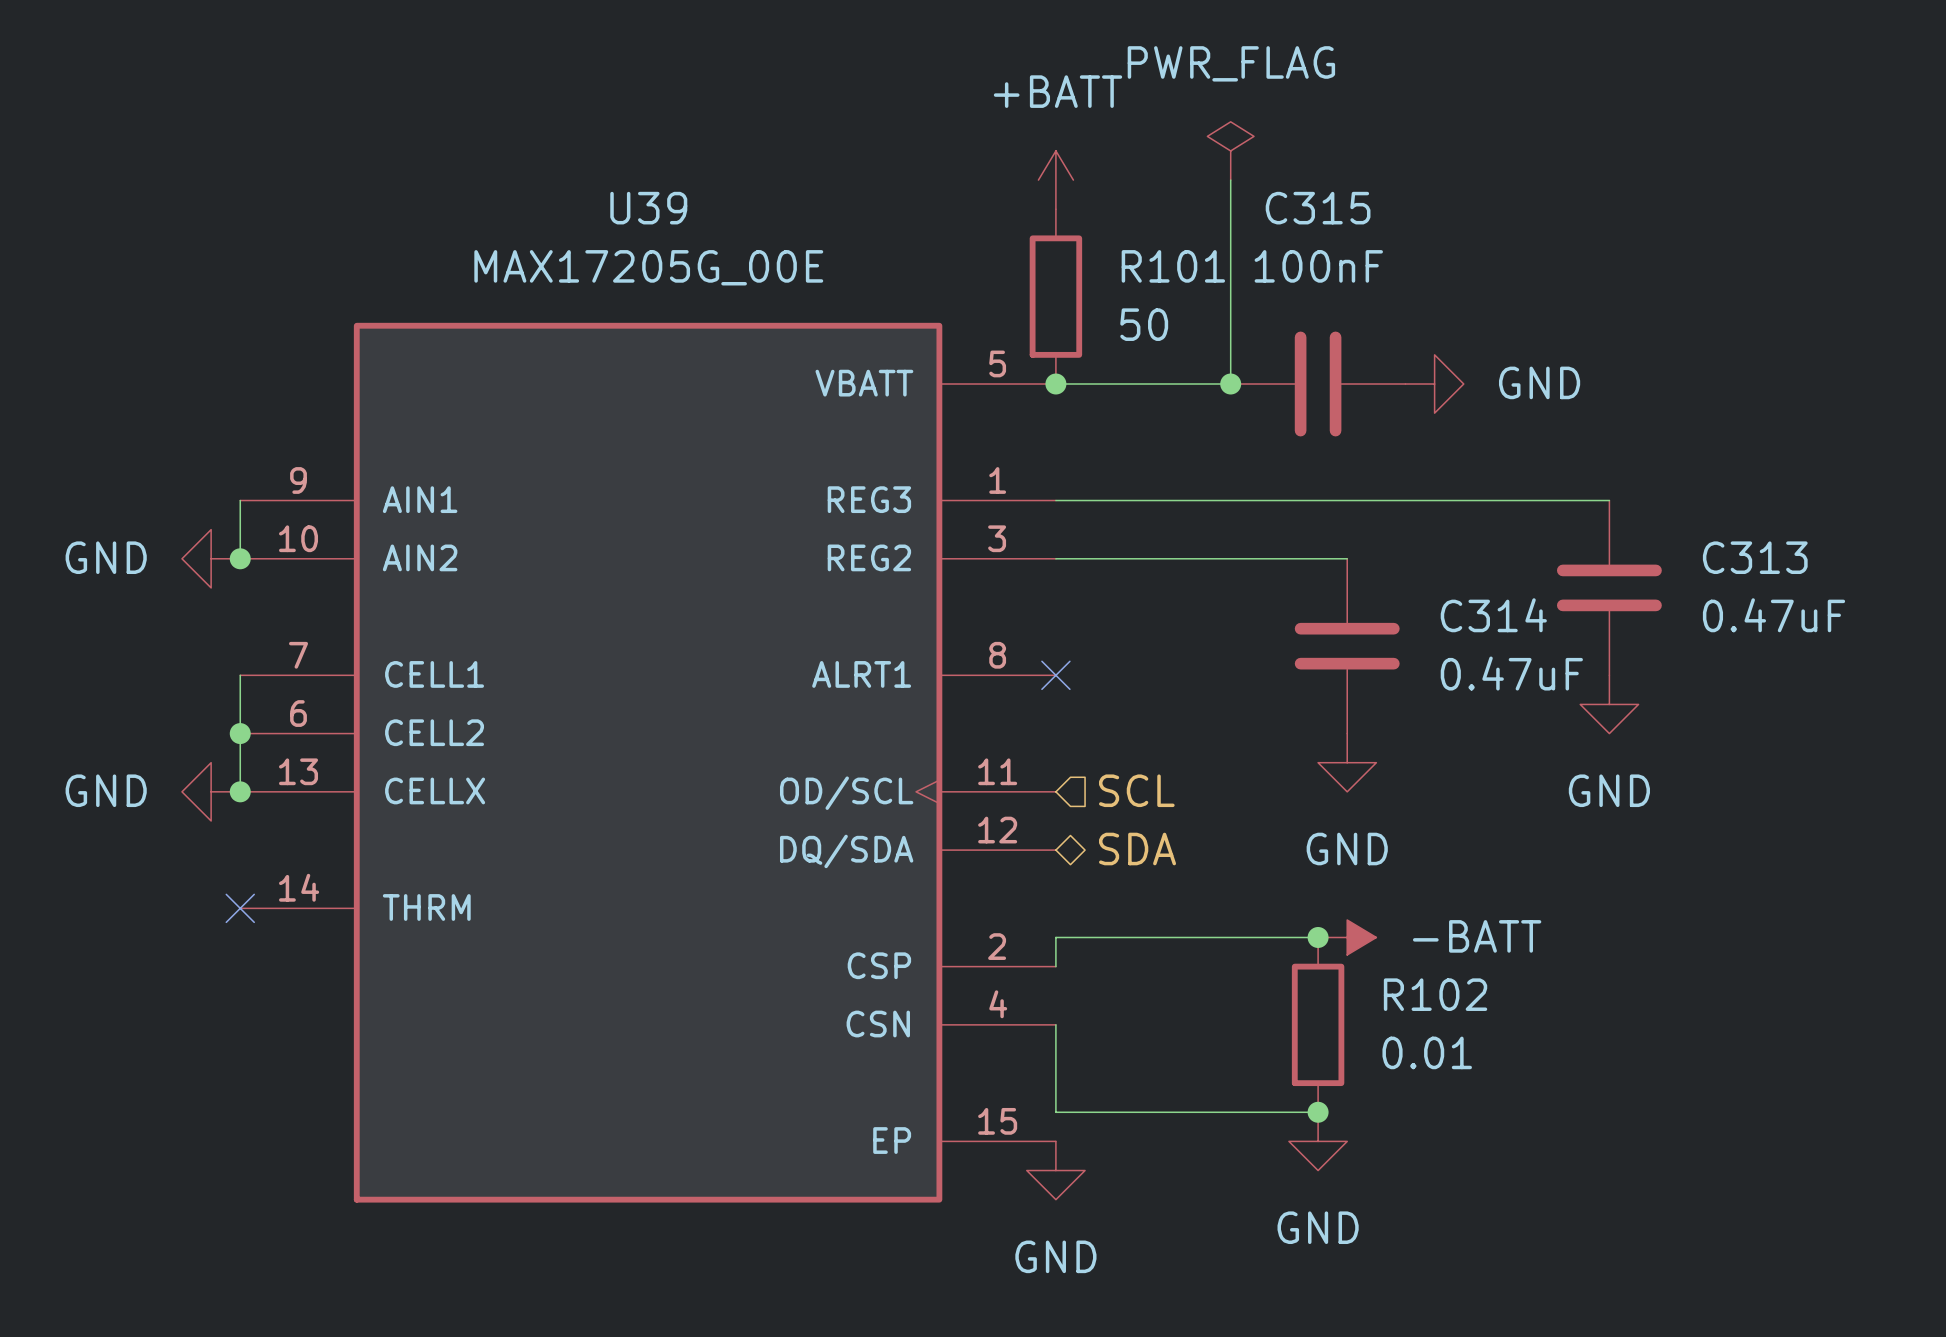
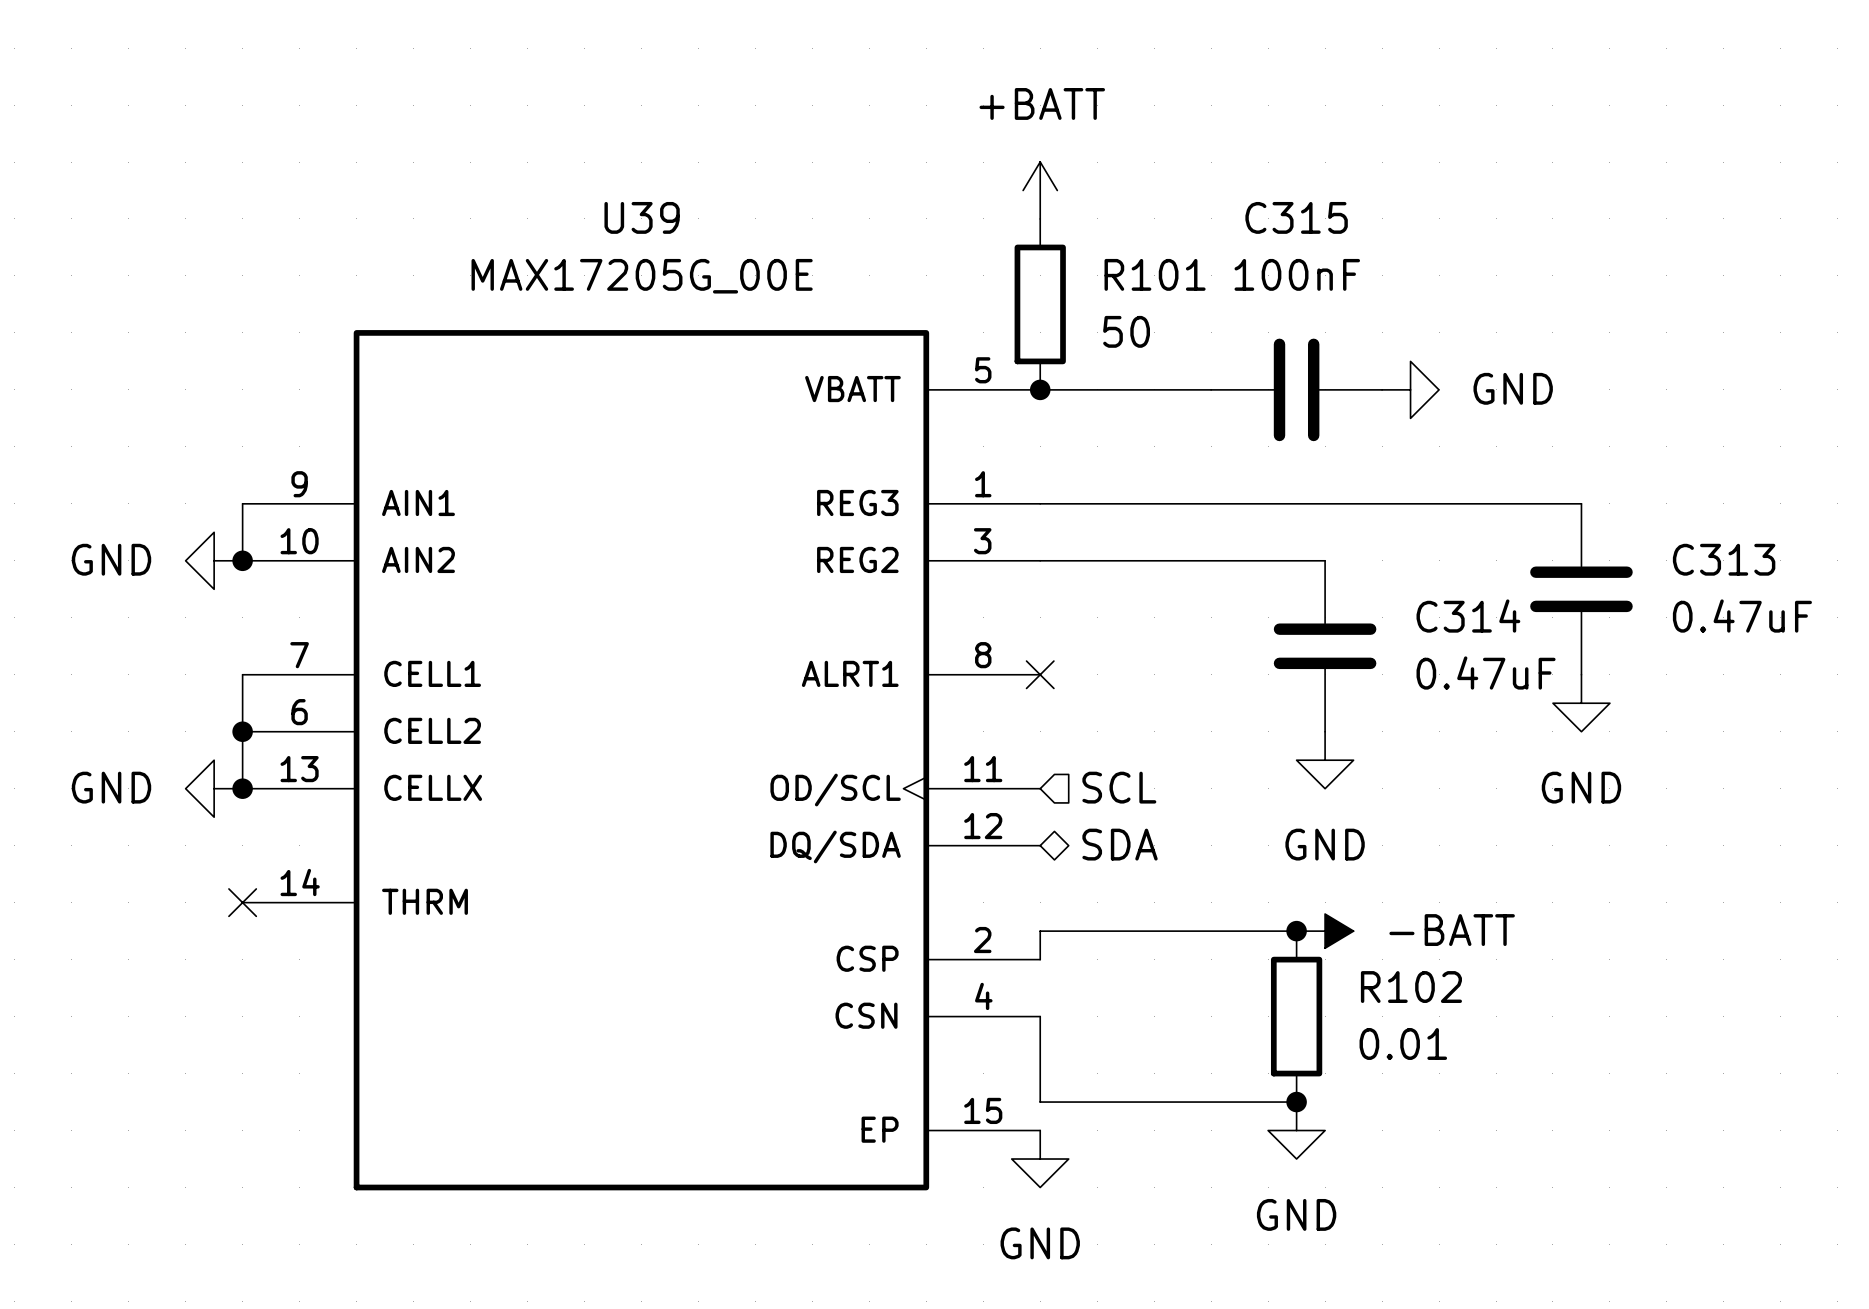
power symbol: PWR_FLAG (1230, 150) -> none
wire: (1230, 180) (1230, 384) -> none
junction: (1230, 384) -> none

